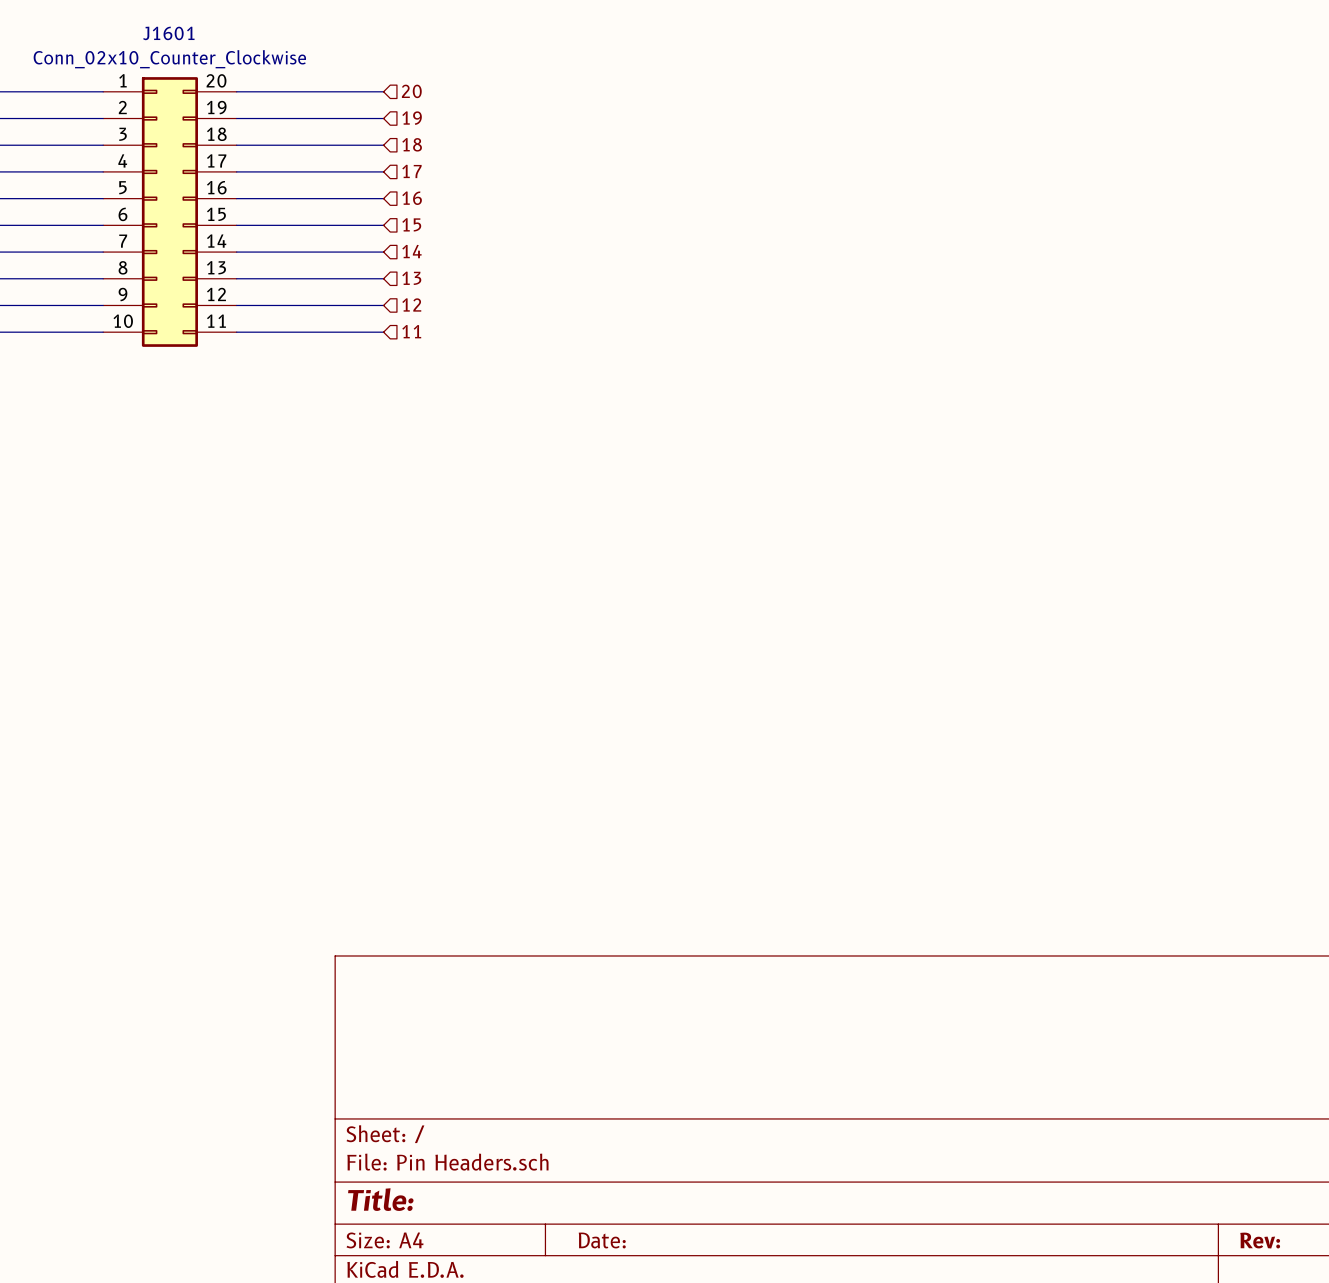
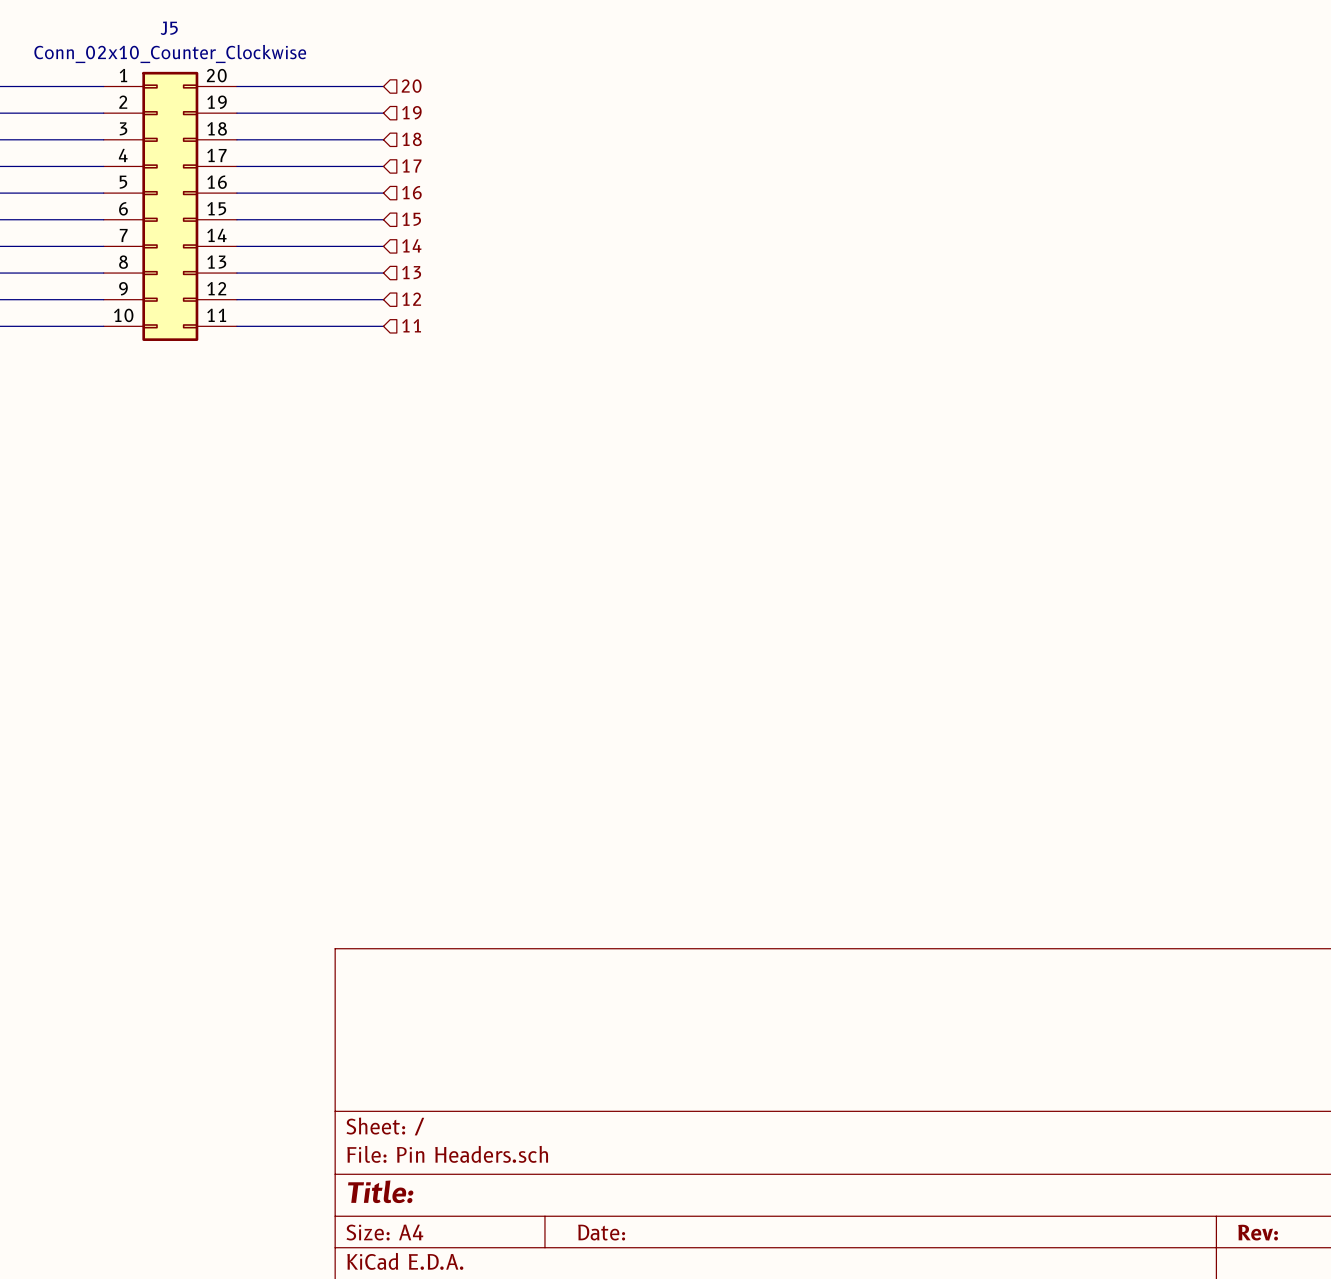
J1601 name: J1601 (168, 33) -> J5 (169, 28)

